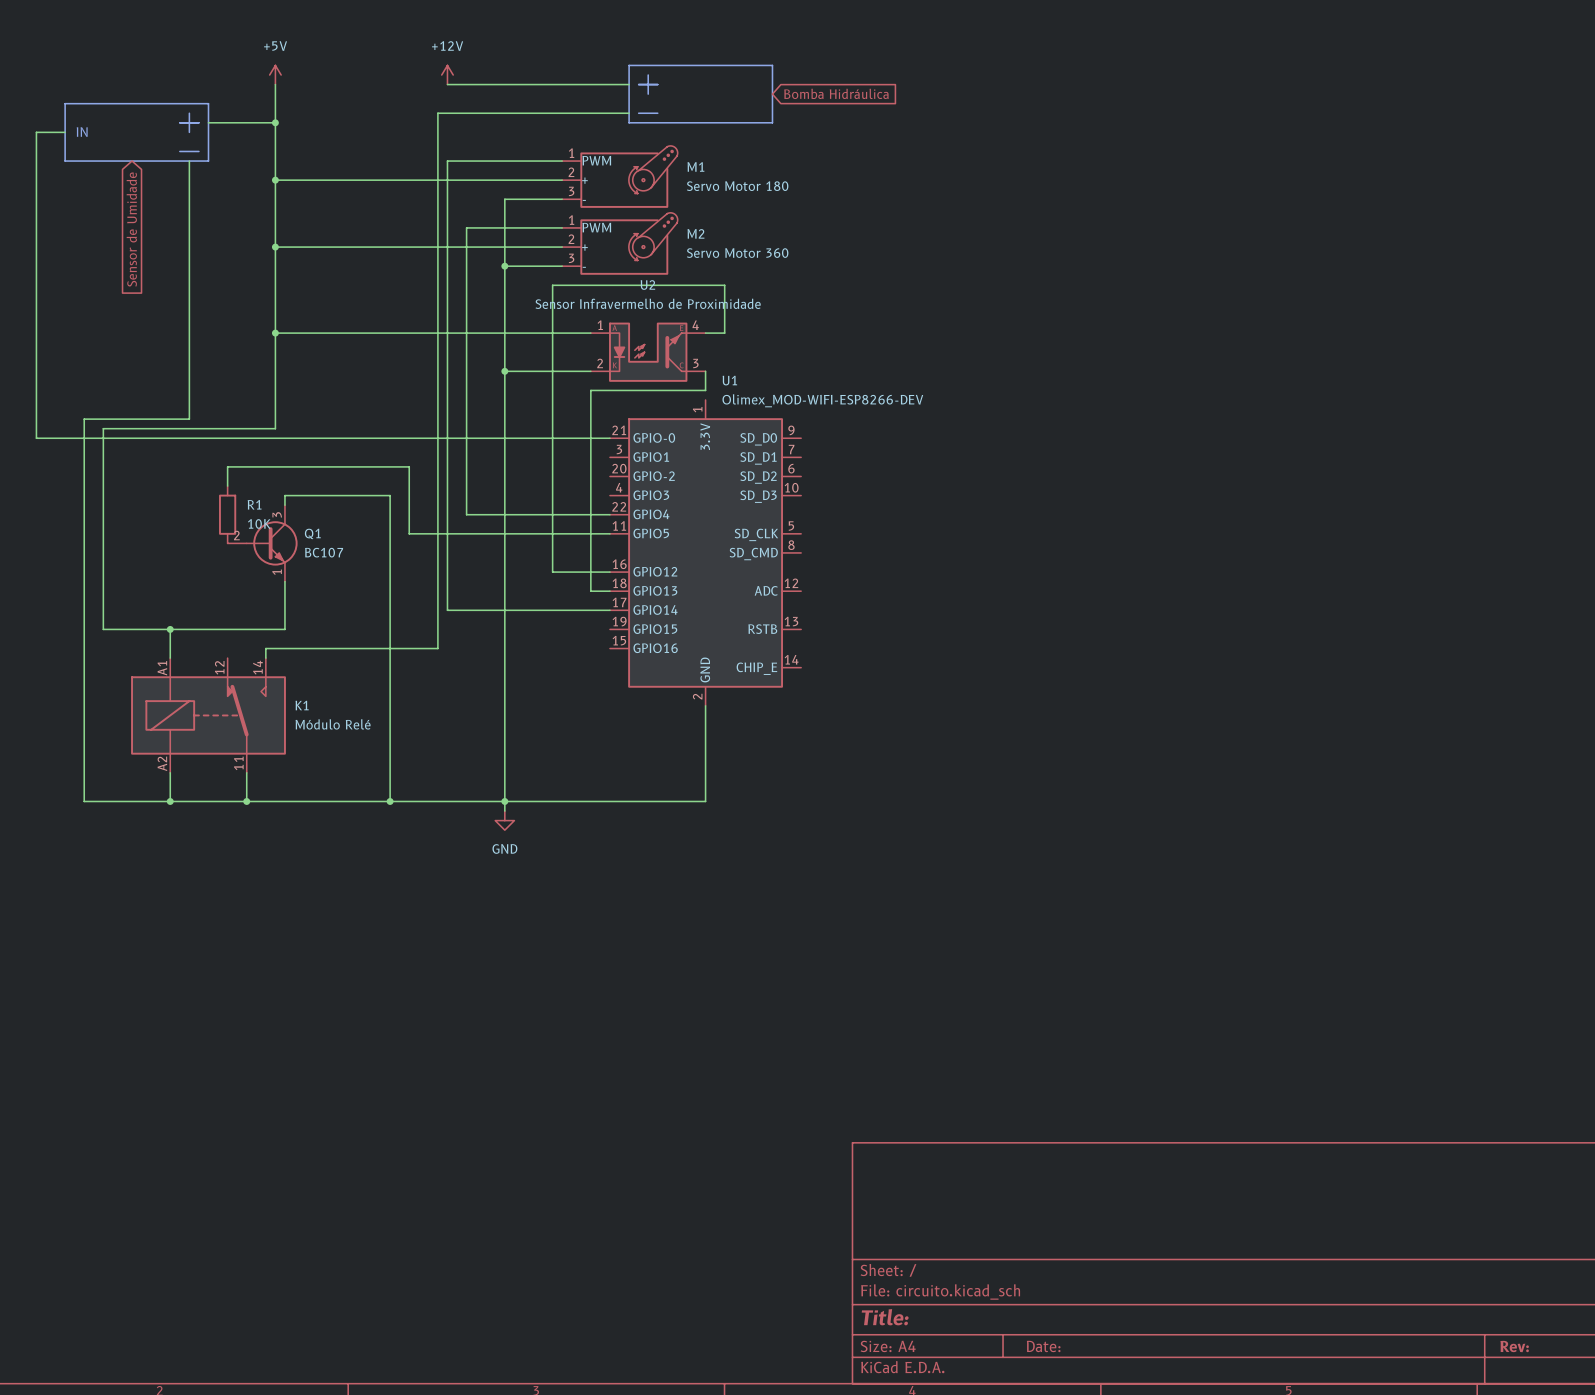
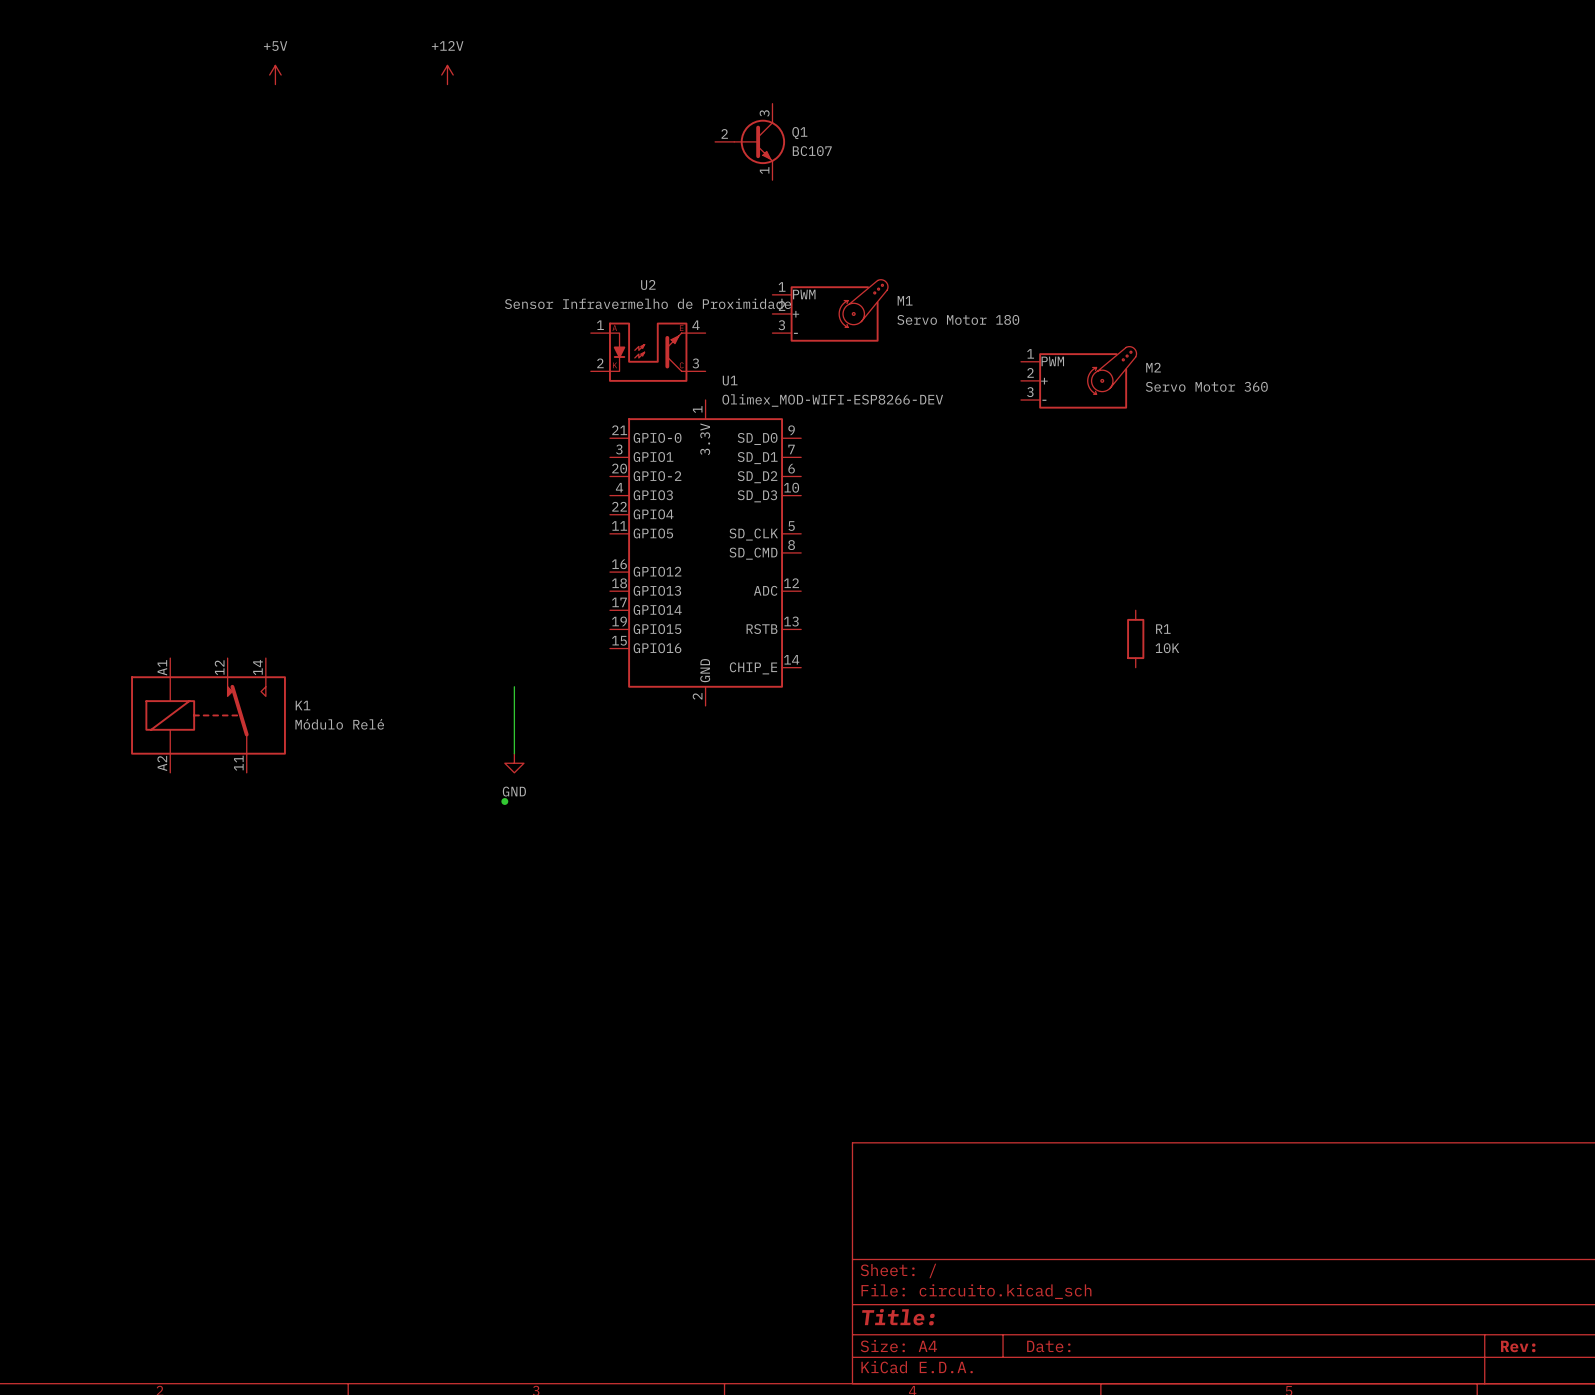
line: (629, 65) (772, 65) (772, 122) (629, 122) (629, 65) -> none
line: (648, 75) (648, 94) -> none
wire: (275, 84) (275, 428) (103, 428) (103, 629) (284, 629) (284, 581) -> none
wire: (447, 84) (629, 84) -> none
line: (638, 84) (657, 84) -> none
global label: Bomba Hidráulica (836, 93) -> none
line: (65, 103) (208, 103) (208, 161) (65, 161) (65, 103) -> none
line: (189, 113) (189, 132) -> none
wire: (629, 113) (437, 113) (437, 648) (265, 648) (265, 658) -> none
line: (638, 113) (657, 113) -> none
line: (179, 122) (198, 122) -> none
wire: (208, 122) (275, 122) -> none
junction: (275, 122) -> none
wire: (65, 132) (36, 132) (36, 438) (609, 438) -> none
text: IN (82, 132) -> none
line: (179, 151) (198, 151) -> none
wire: (189, 161) (189, 419) (84, 419) (84, 801) (705, 801) (705, 705) -> none
wire: (562, 161) (447, 161) (447, 610) (609, 610) -> none
M1 position: (619, 176) -> (830, 310)
wire: (275, 180) (562, 180) -> none
junction: (275, 180) -> none
wire: (562, 199) (504, 199) (504, 811) -> none
wire: (562, 227) (466, 227) (466, 514) (609, 514) -> none
global label: Sensor de Umidade (131, 229) -> none
M2 position: (619, 243) -> (1078, 377)
wire: (275, 247) (562, 247) -> none
junction: (275, 247) -> none
wire: (504, 266) (562, 266) -> none
junction: (504, 266) -> none
wire: (275, 333) (590, 333) -> none
junction: (275, 333) -> none
wire: (705, 333) (724, 333) (724, 285) (552, 285) (552, 572) (609, 572) -> none
wire: (504, 371) (590, 371) -> none
junction: (504, 371) -> none
wire: (705, 371) (705, 390) (590, 390) (590, 591) (609, 591) -> none
wire: (227, 486) (227, 466) (409, 466) (409, 533) (609, 533) -> none
wire: (284, 505) (284, 495) (390, 495) (390, 801) -> none
R1 position: (227, 514) -> (1135, 638)
Q1 position: (262, 543) -> (750, 141)
wire: (170, 629) (170, 658) -> none
junction: (170, 629) -> none
wire: none -> (514, 686) (514, 753)
wire: (170, 772) (170, 801) -> none
wire: (246, 772) (246, 801) -> none
junction: (170, 801) -> none
junction: (246, 801) -> none
junction: (390, 801) -> none
power symbol position: GND (504, 820) -> GND (514, 763)

